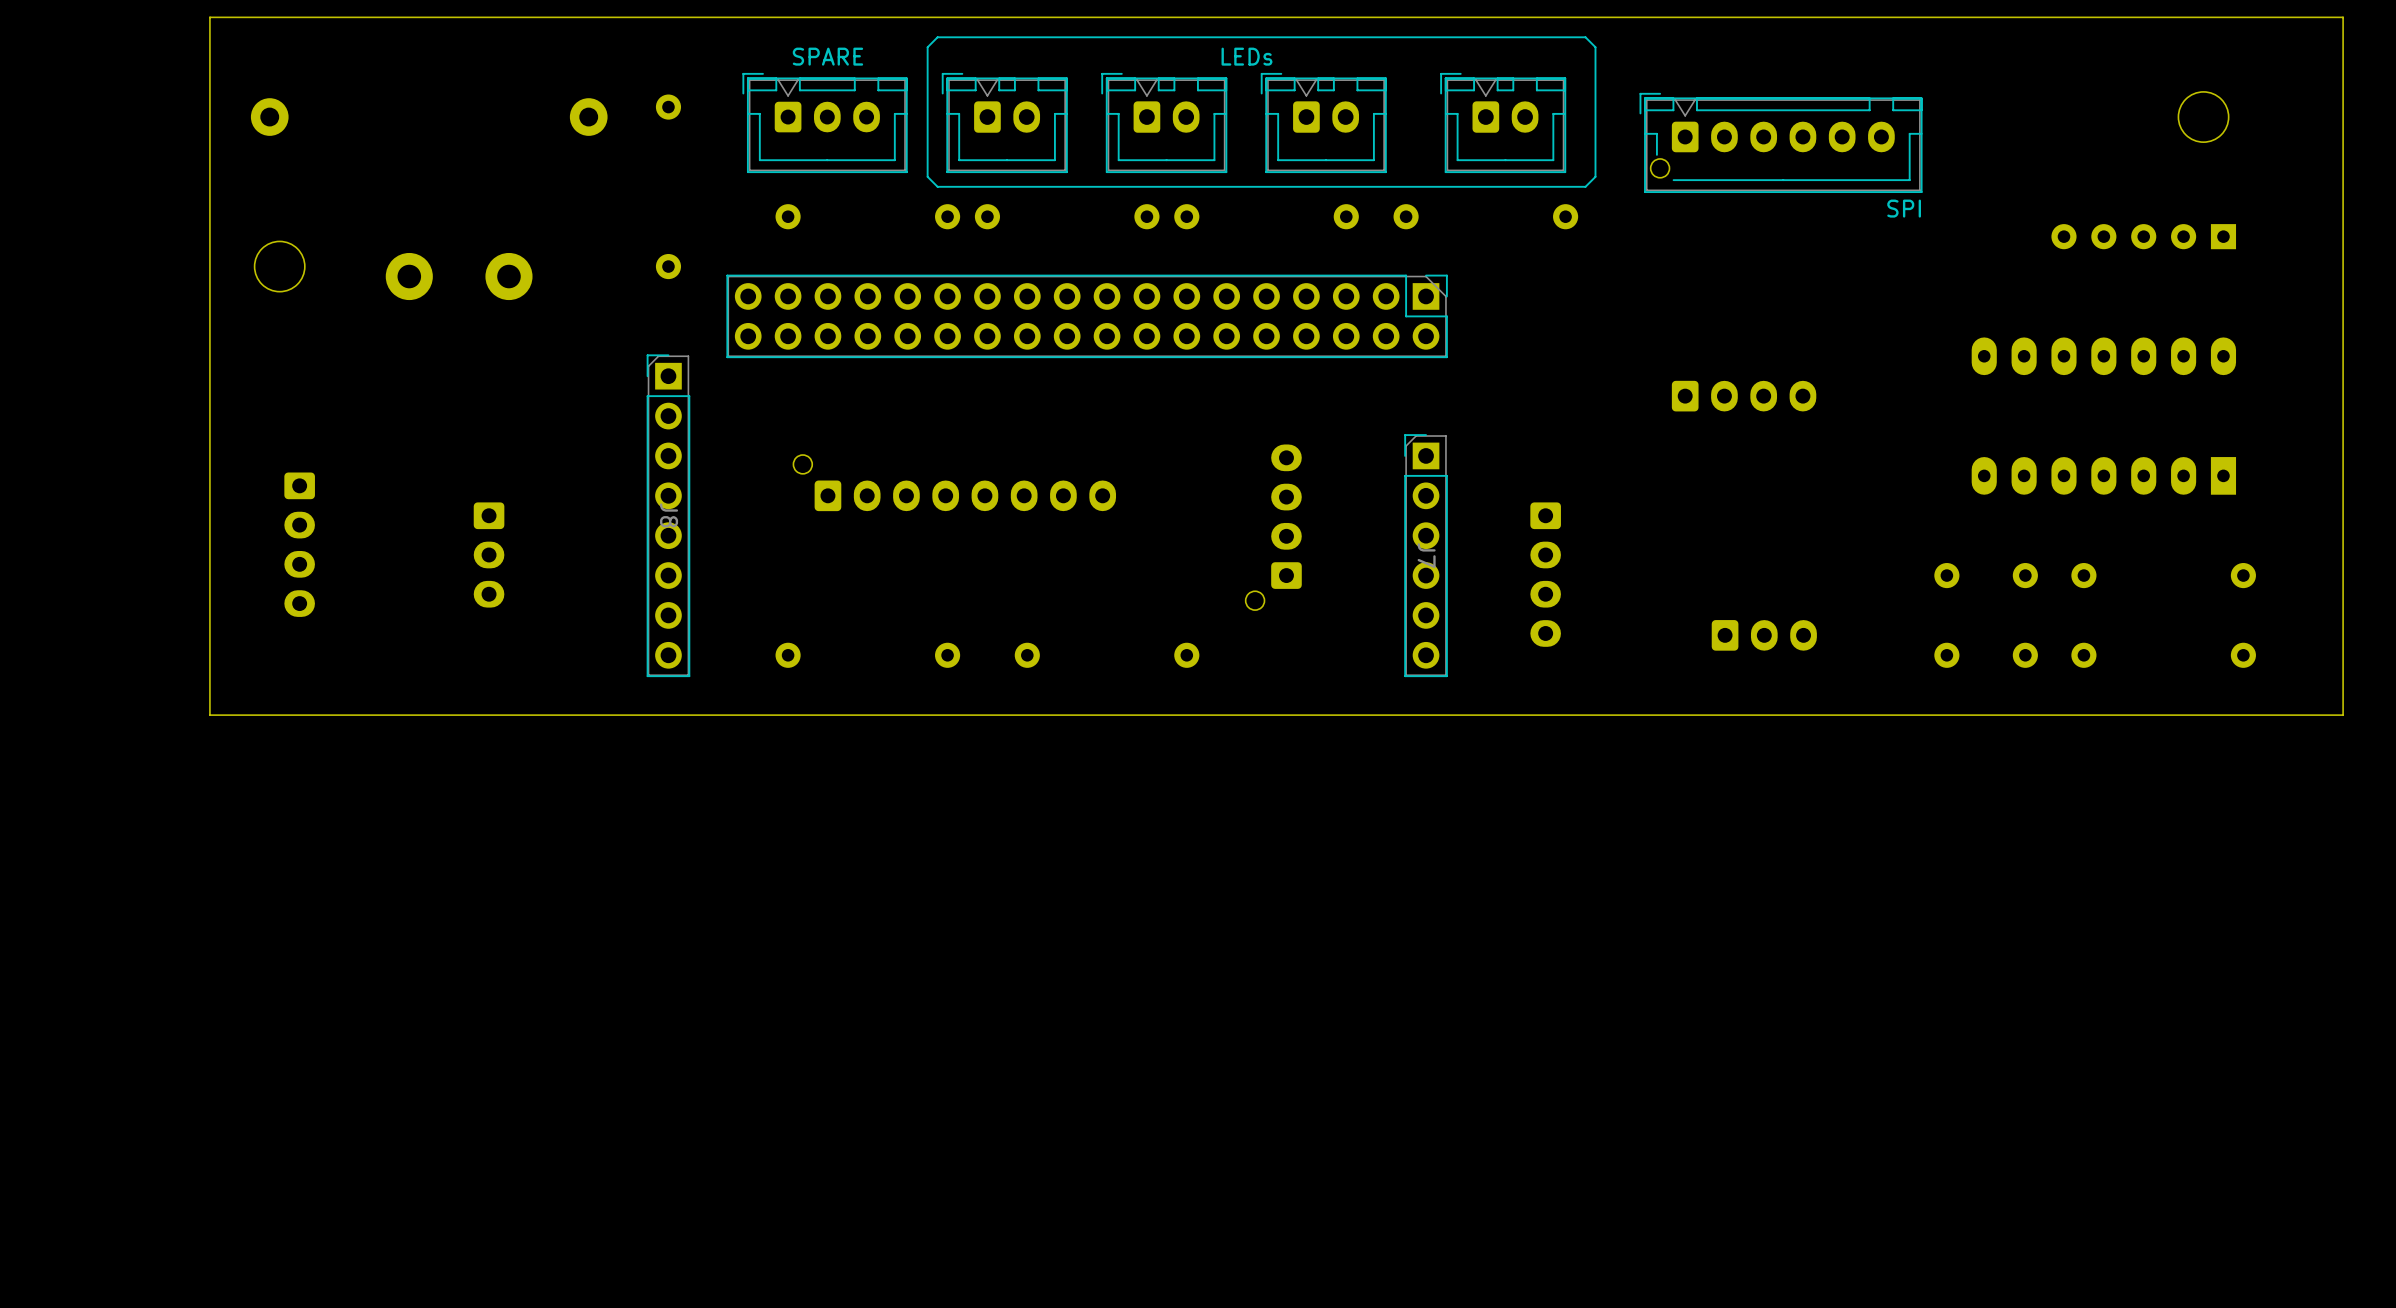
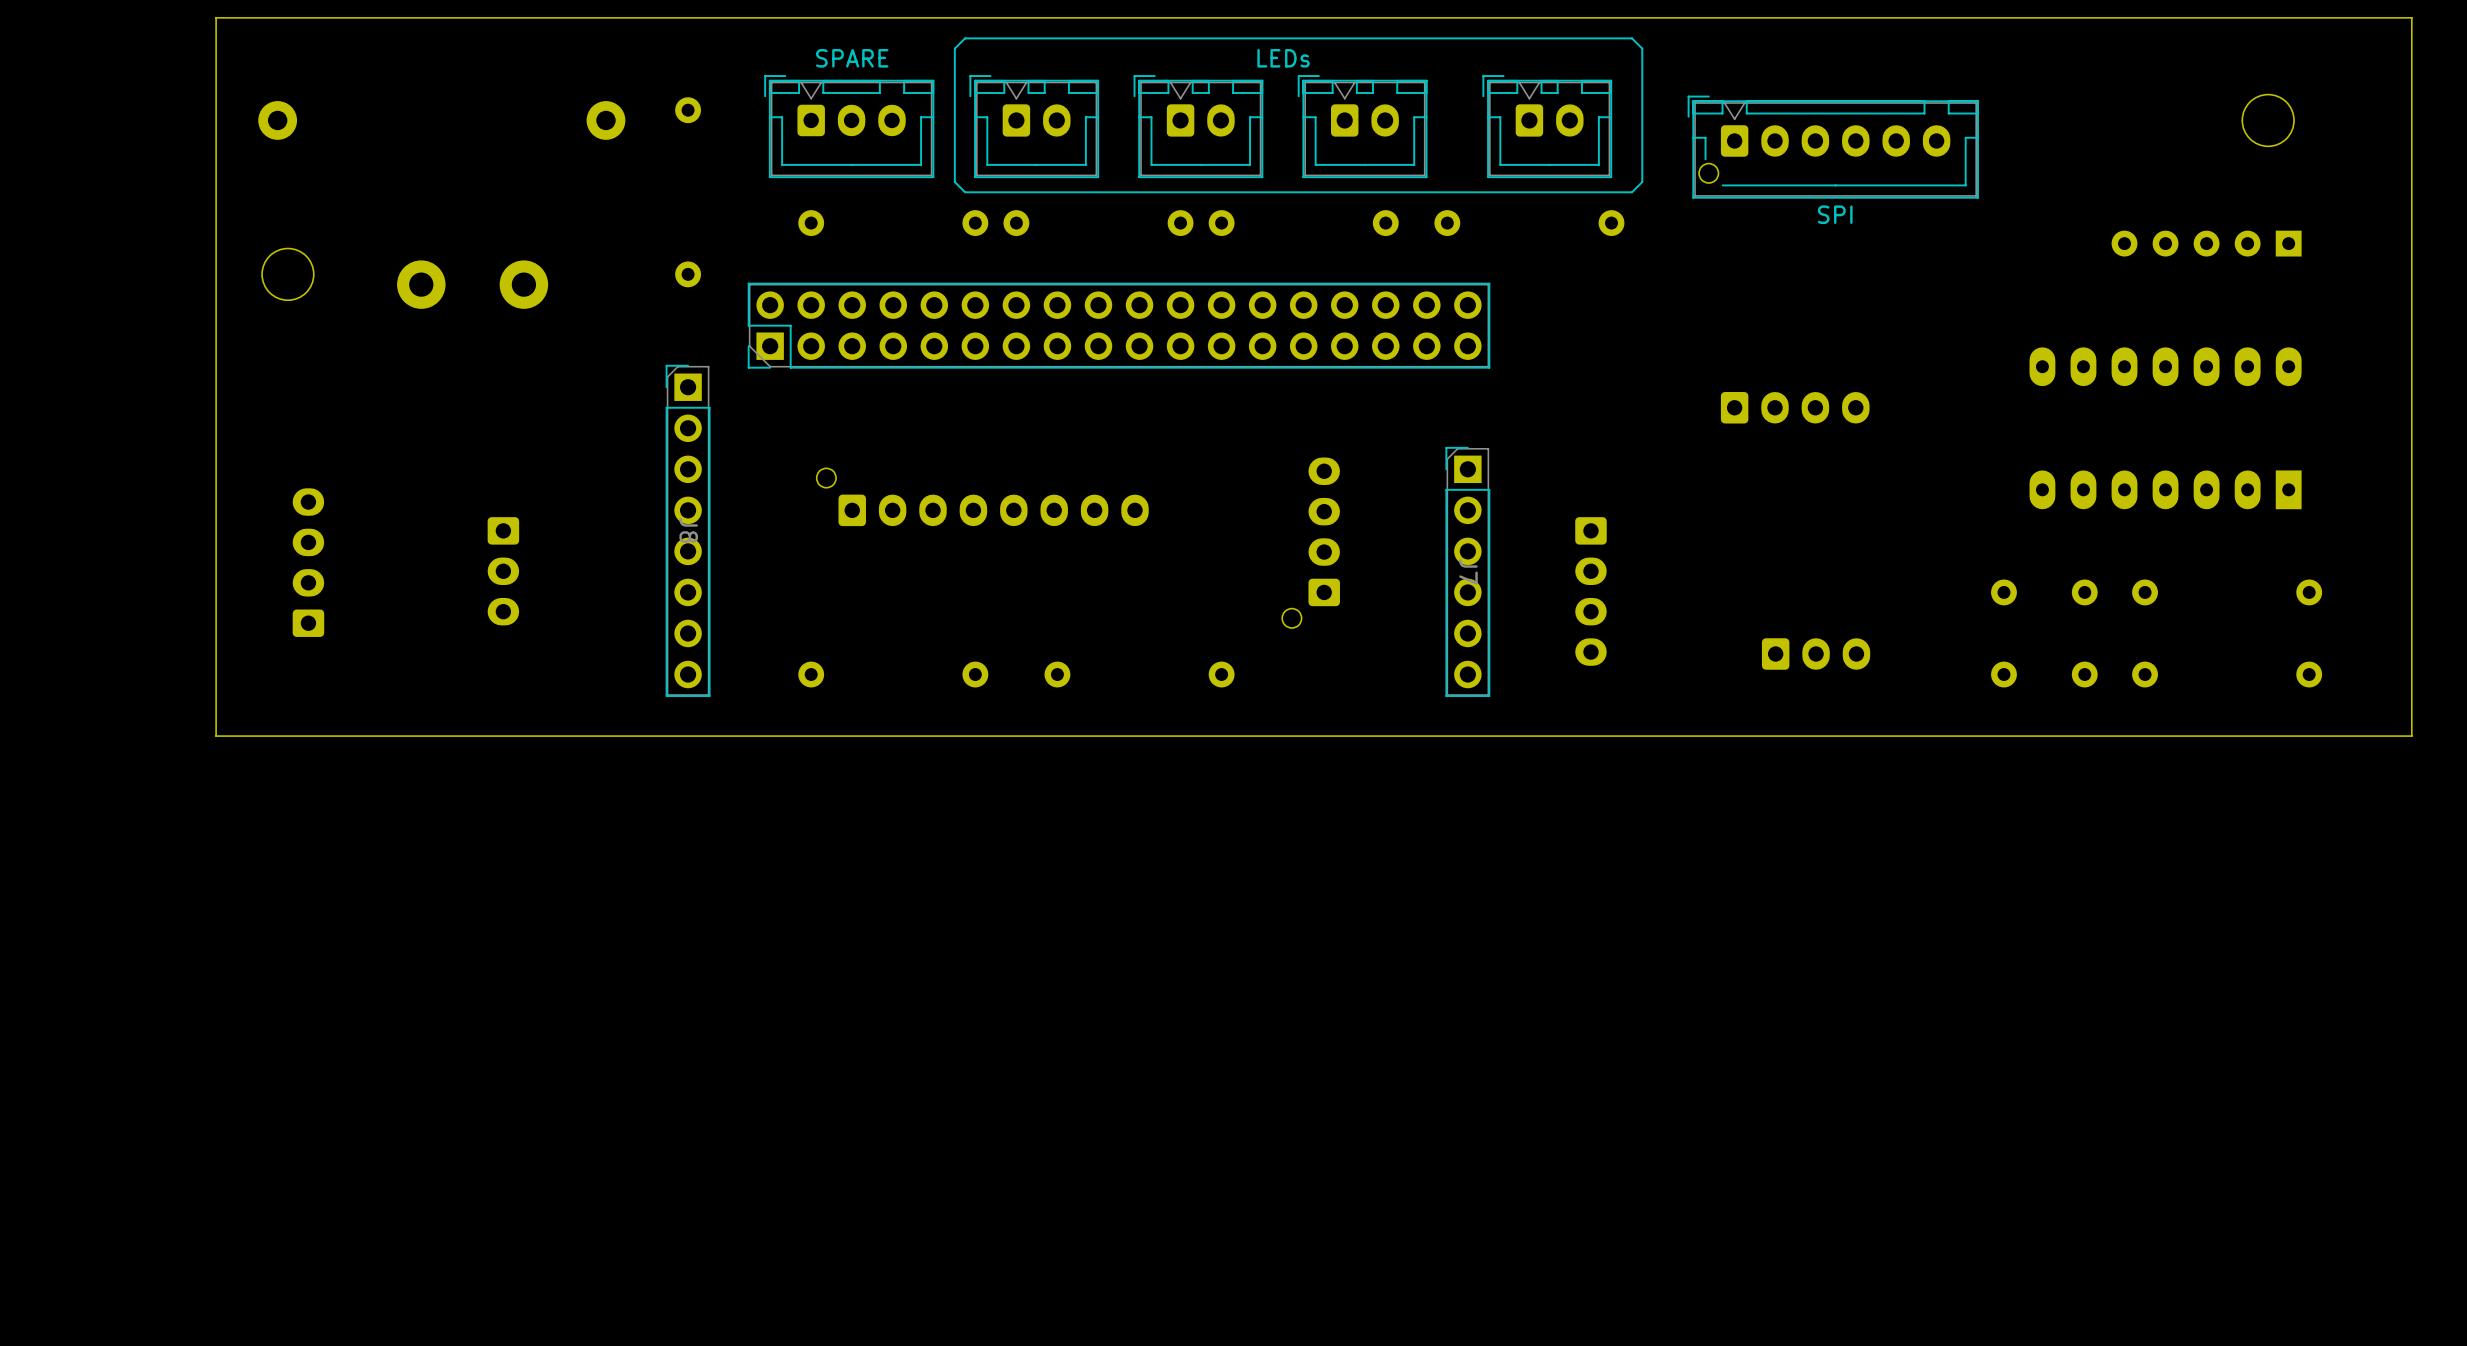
part value position: SPI (1904, 208) -> SPI (1835, 214)
part rotation: 0° (1087, 316) -> 180° (1119, 325)
part rotation: 0° (299, 544) -> 180° (308, 562)

